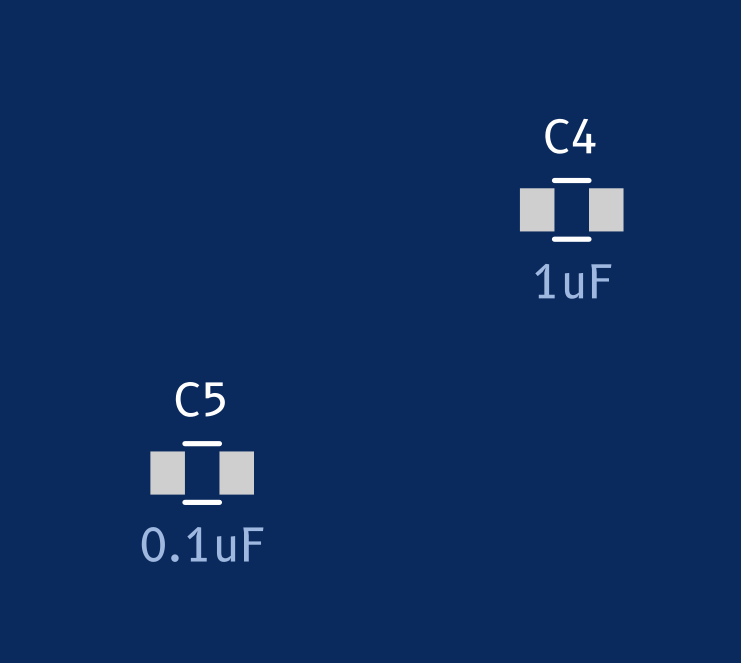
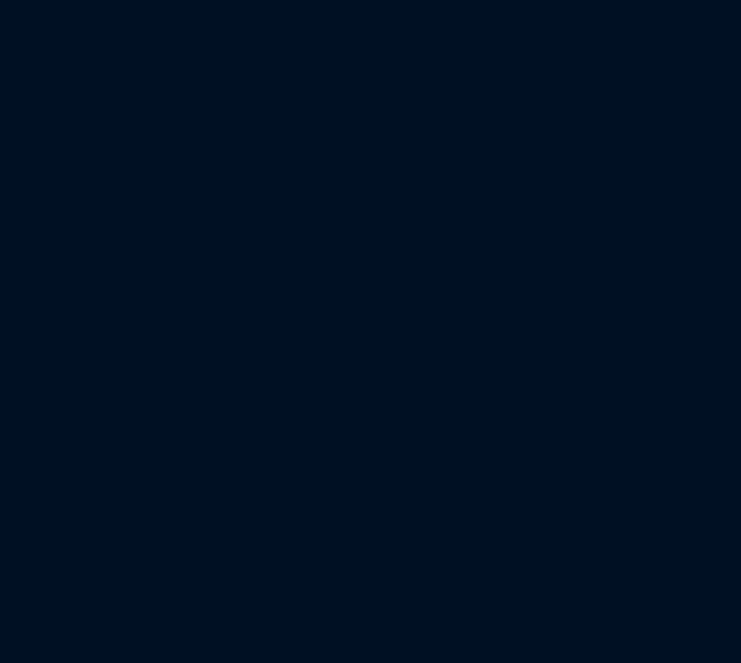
C4: 1uF (571, 209) -> none
C5: 0.1uF (202, 473) -> none

